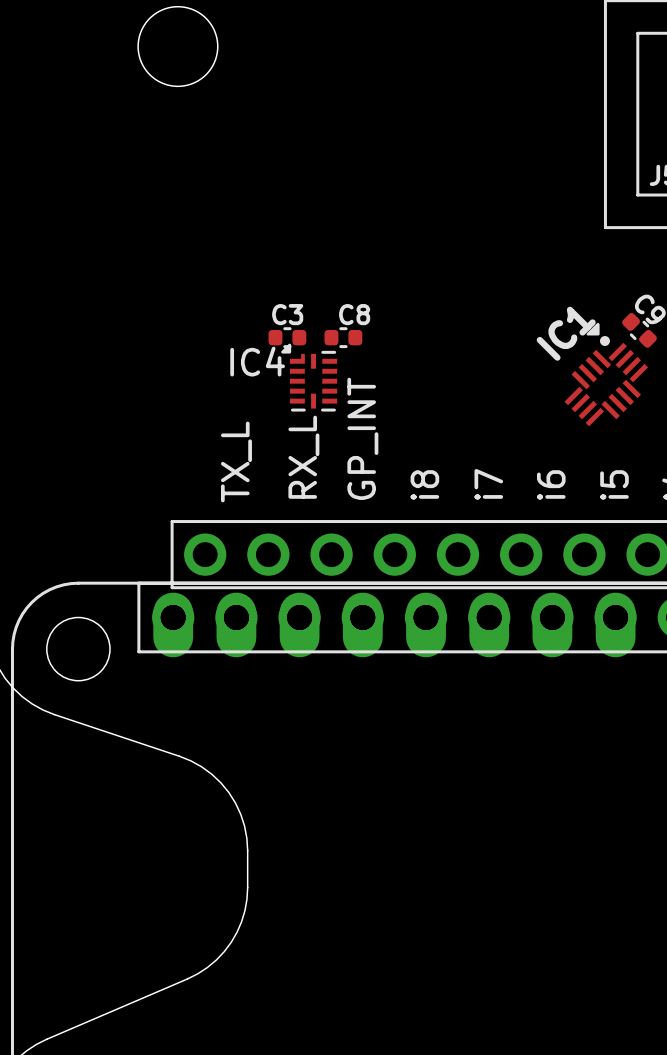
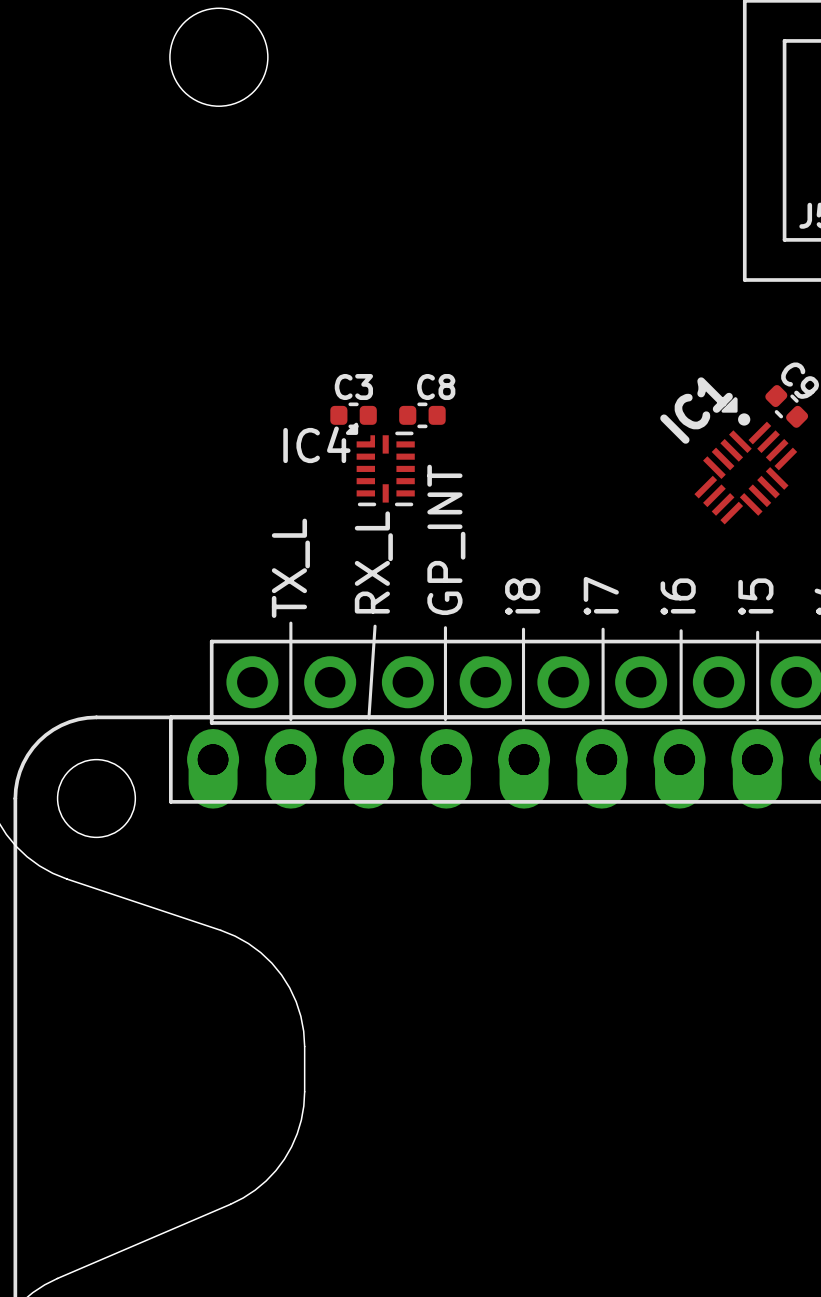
line: none -> (290, 623) (290, 719)
line: none -> (375, 626) (368, 718)
line: none -> (445, 627) (445, 719)
line: none -> (523, 629) (523, 721)
line: none -> (603, 629) (603, 719)
line: none -> (681, 630) (681, 719)
line: none -> (757, 632) (757, 719)

